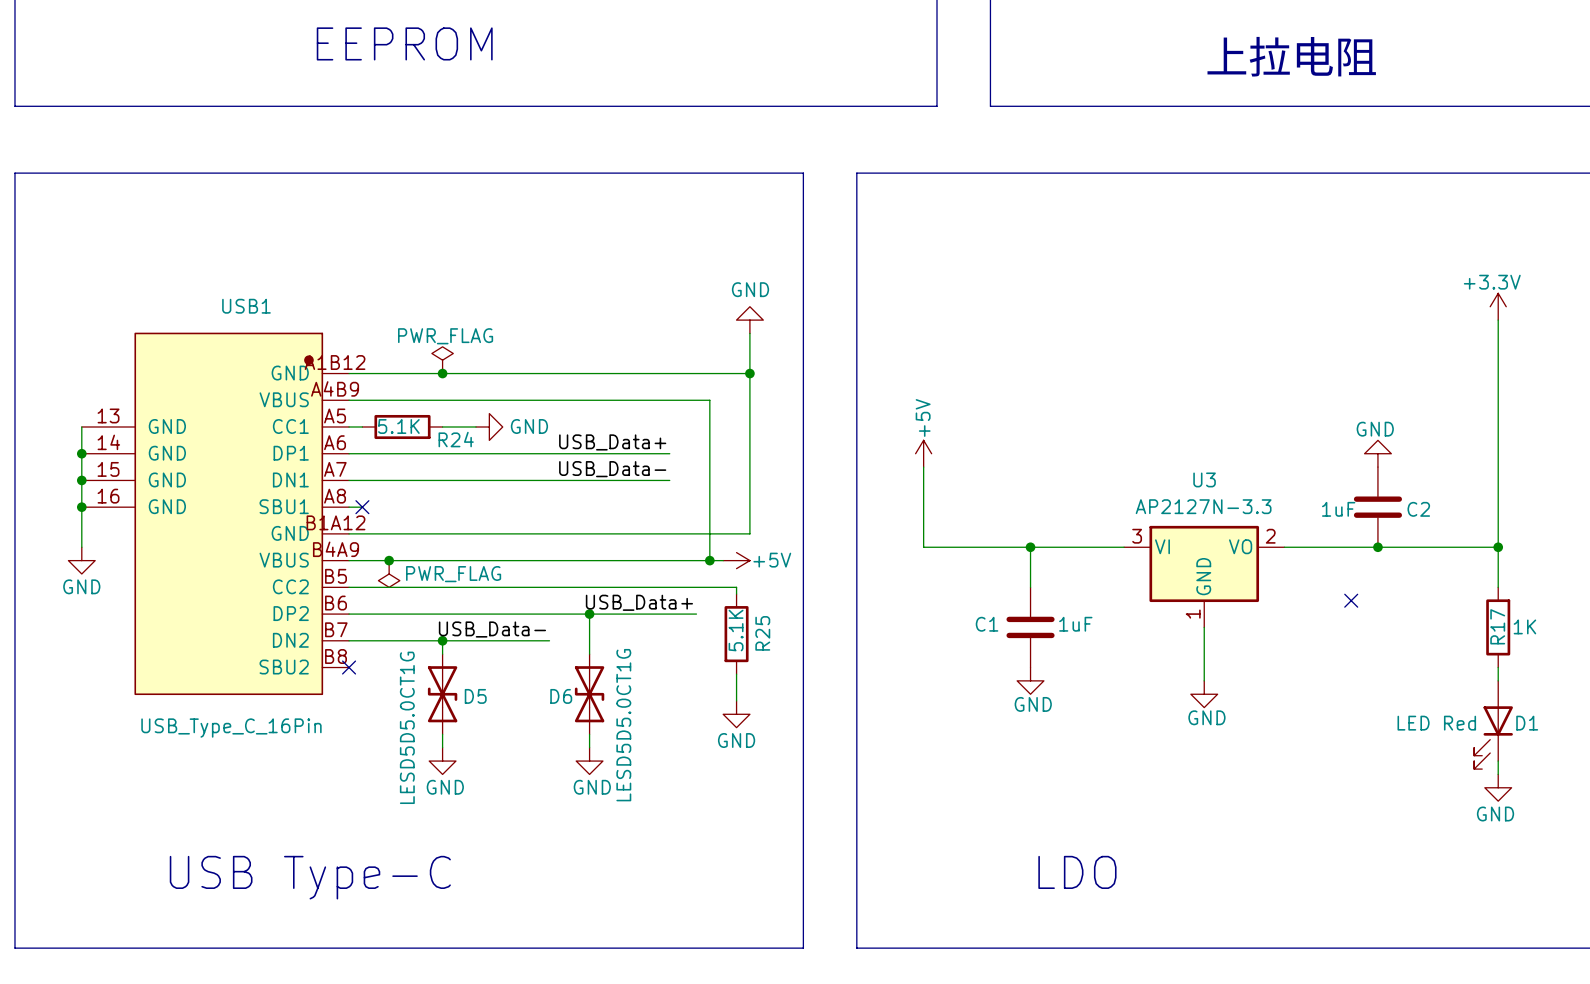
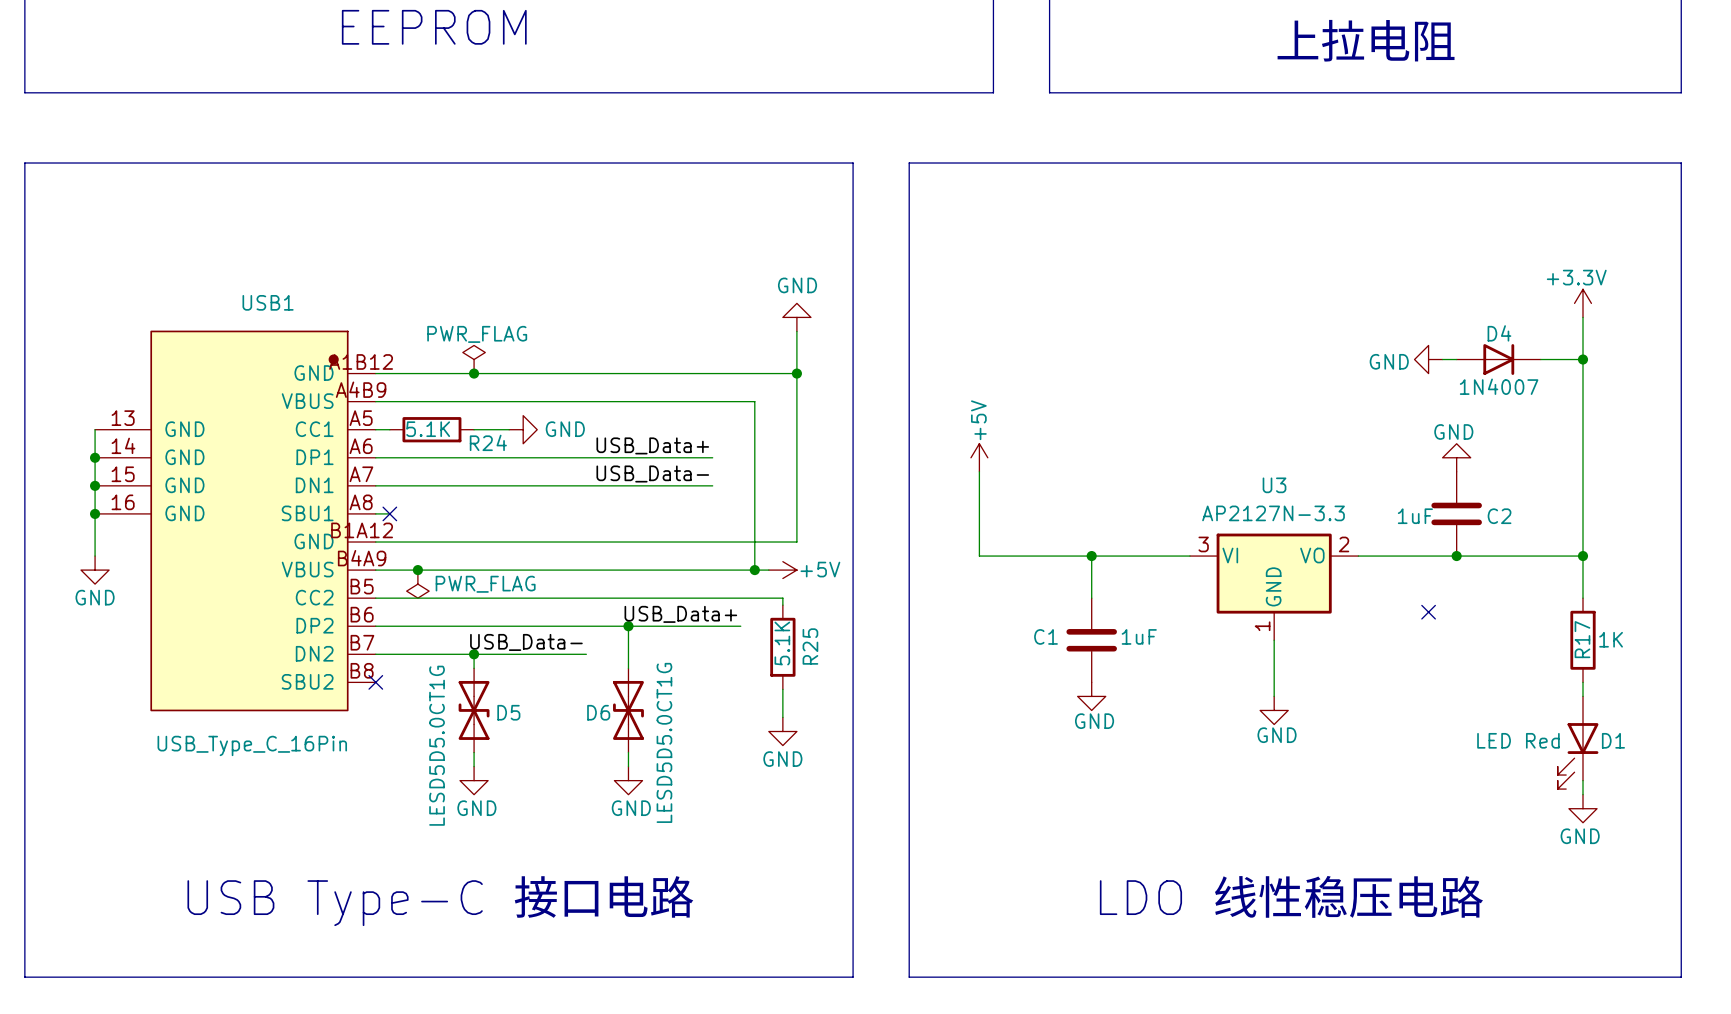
power symbol: none -> GND (1428, 359)
wire: none -> (1442, 359) (1456, 359)
D4: none -> 1N4007 (1498, 359)
wire: none -> (1540, 359) (1582, 359)
junction: none -> (1582, 359)
text: LDO (1077, 872) -> LDO 线性稳压电路 (1291, 896)
text: USB Type-C (310, 877) -> USB Type-C 接口电路 (440, 900)

